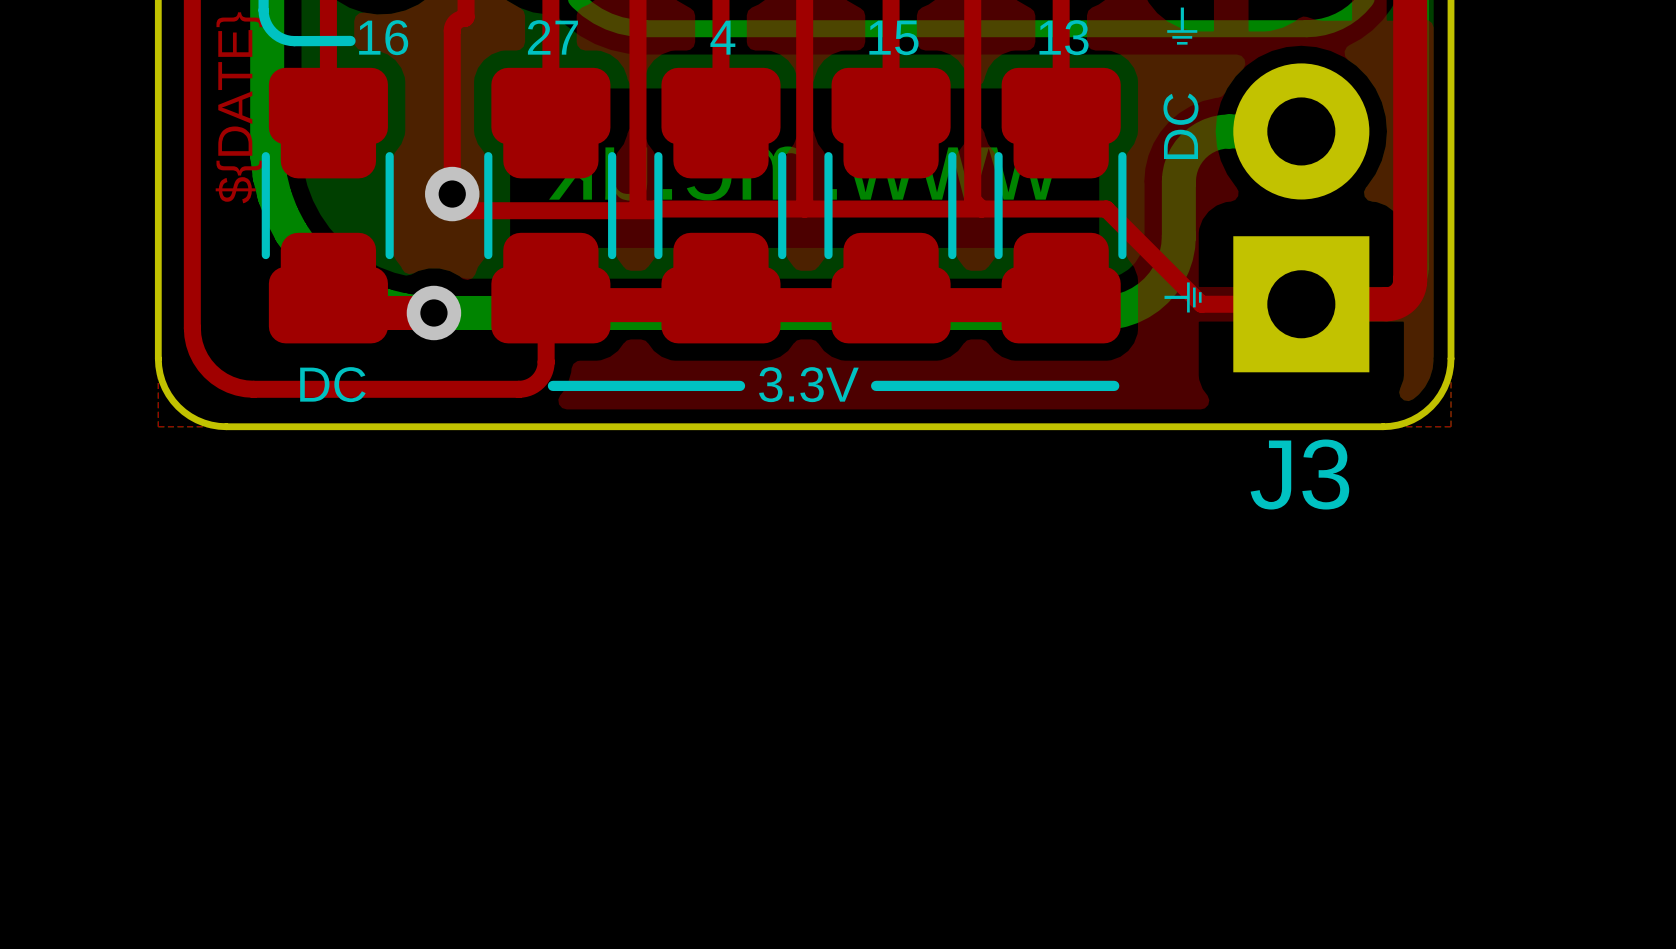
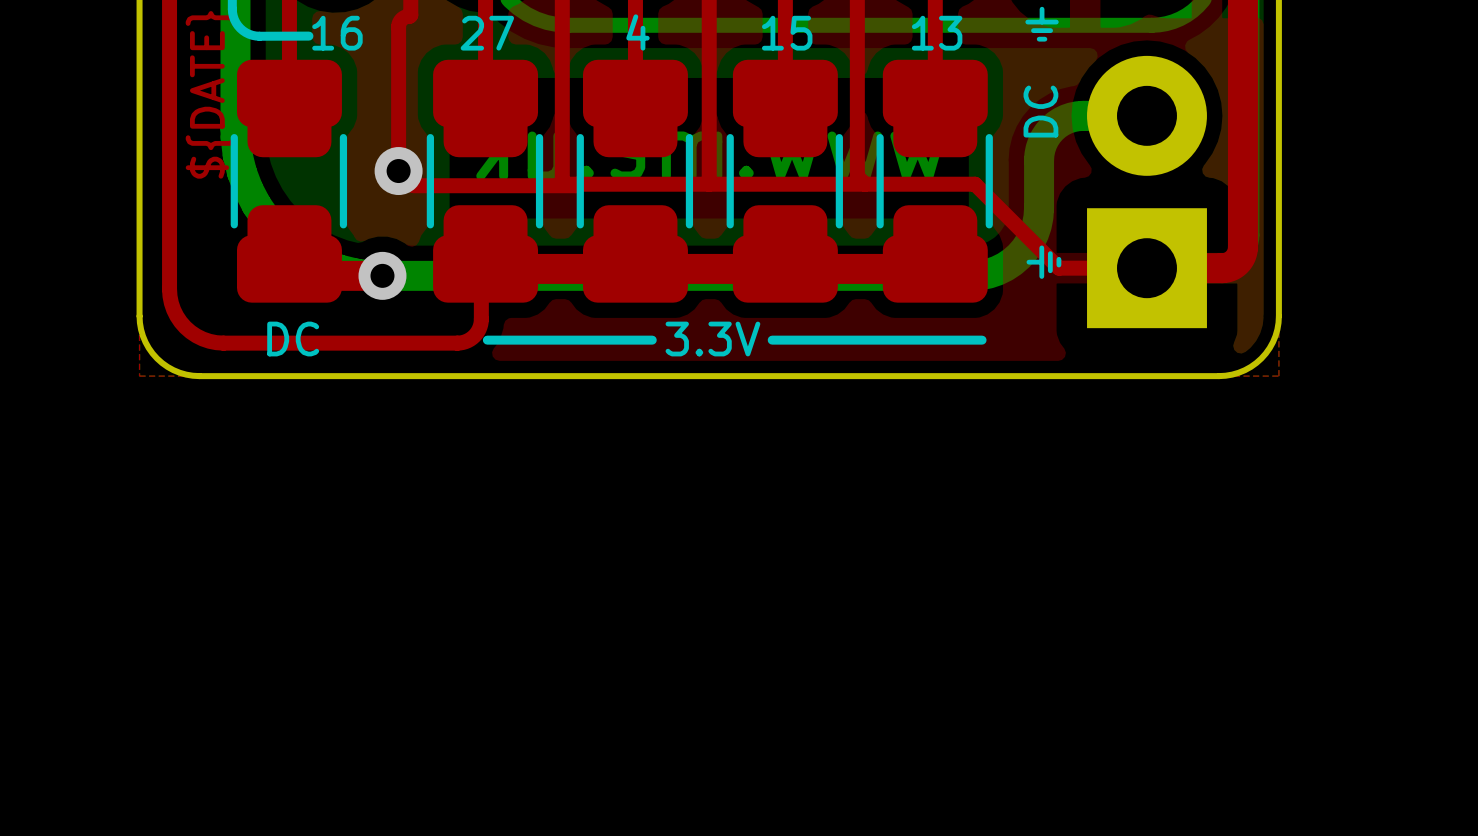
J3 name: J3 (1299, 474) -> none

